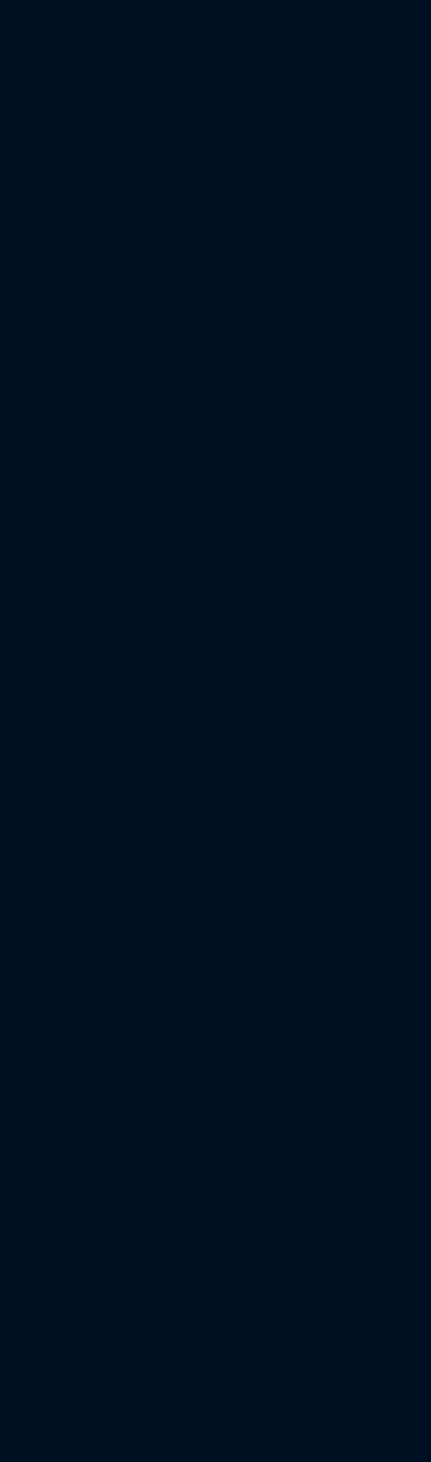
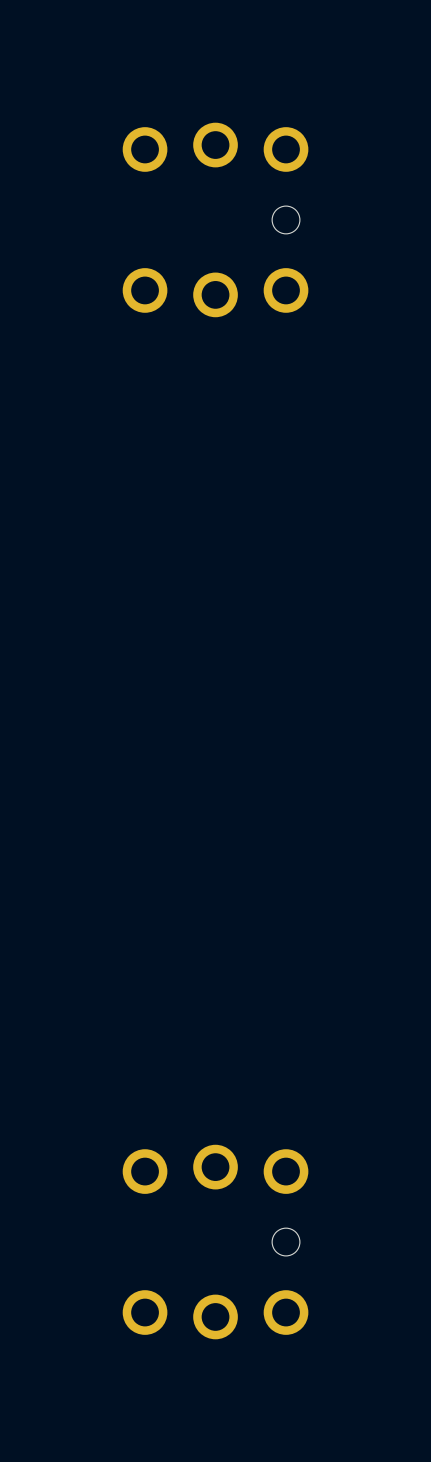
part: none -> (215, 219)
part: none -> (215, 1242)

